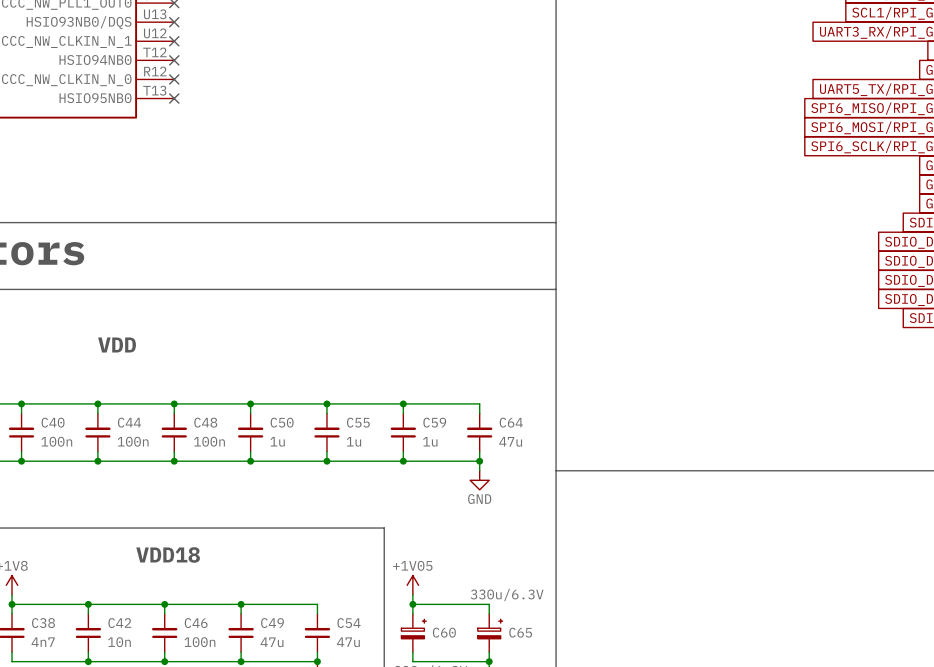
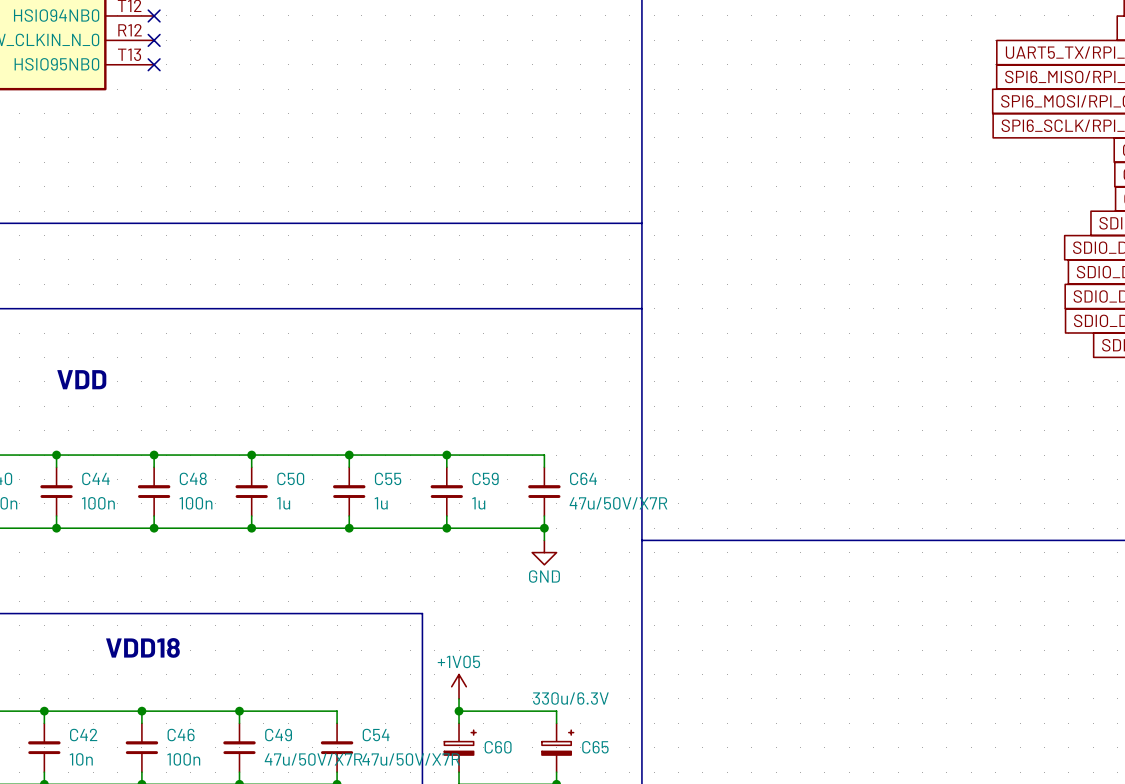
C64 text: 47u (510, 441) -> 47u/50V/X7R (618, 503)
C49 text: 47u (272, 642) -> 47u/50V/X7R (313, 759)
C54 text: 47u (348, 642) -> 47u/50V/X7R (411, 759)

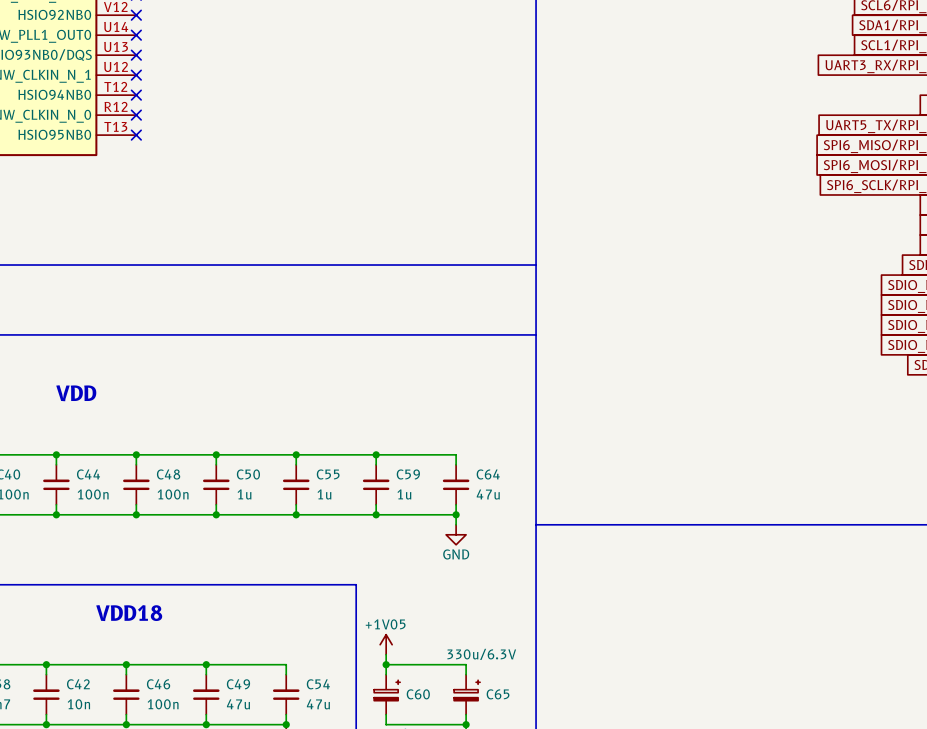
C64 text: 47u/50V/X7R (618, 503) -> 47u (488, 494)
C49 text: 47u/50V/X7R (313, 759) -> 47u (238, 704)
C54 text: 47u/50V/X7R (411, 759) -> 47u (318, 704)

